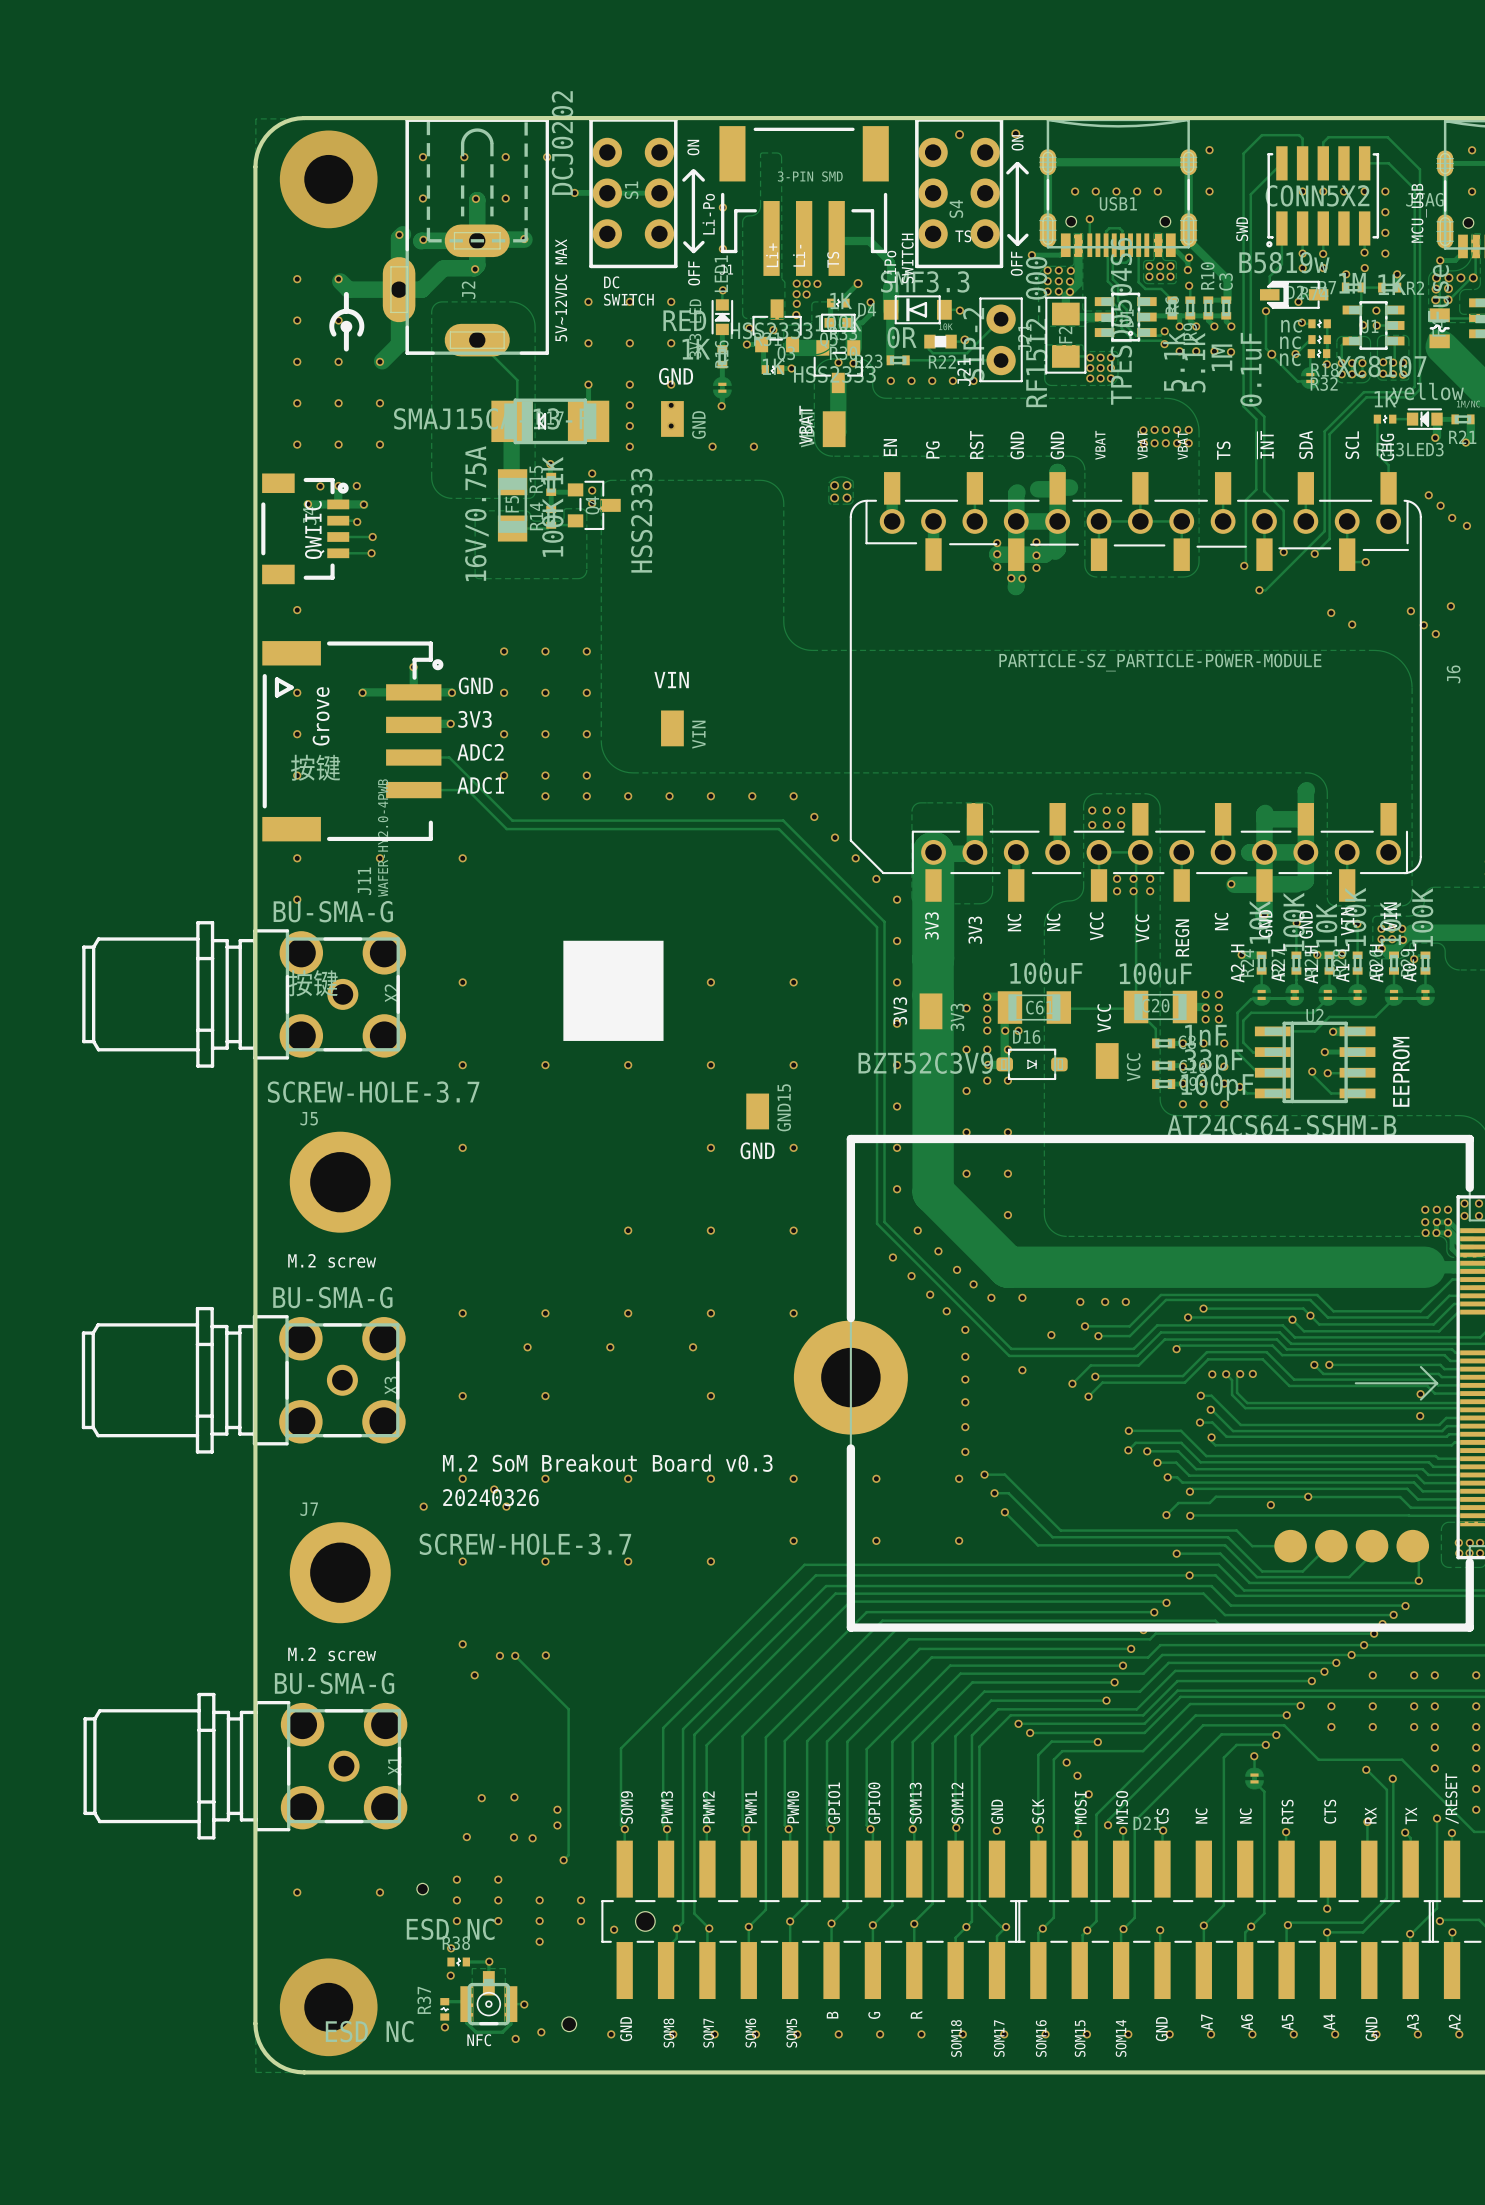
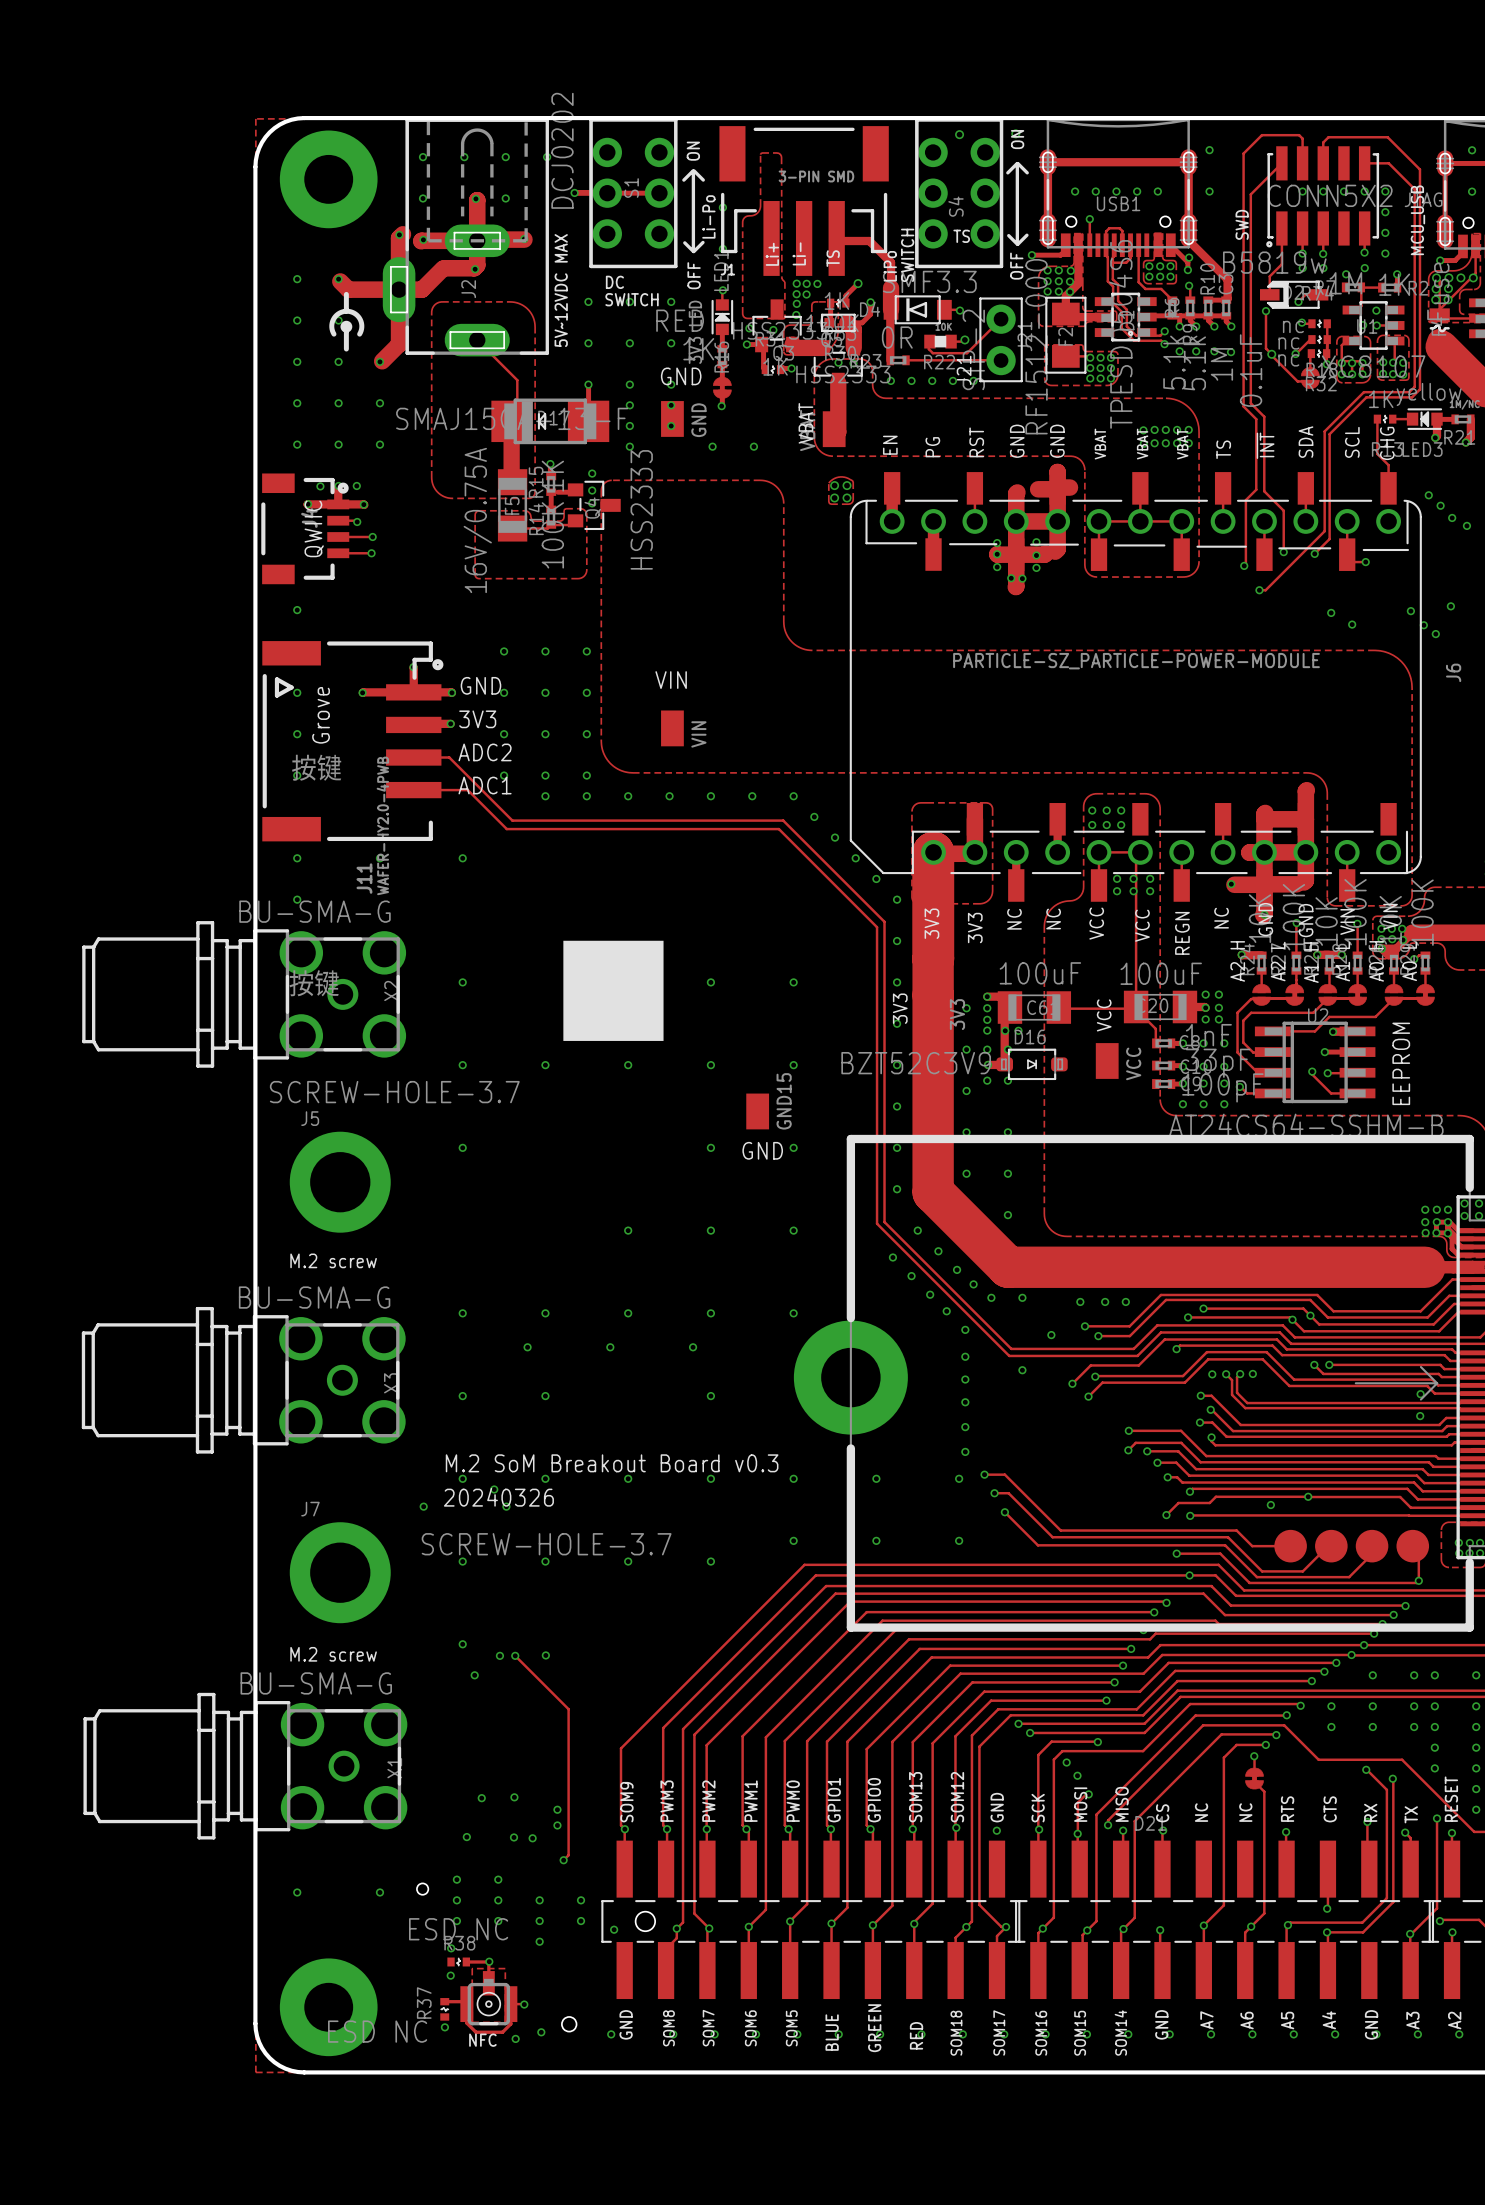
text: /RESET (1452, 1798) -> RESET (1451, 1799)
text: R (916, 2014) -> none
text: B (832, 2015) -> none
text: G (874, 2015) -> none
text: none -> GREEN (874, 2028)
text: none -> BLUE (832, 2032)
text: none -> RED (916, 2035)

